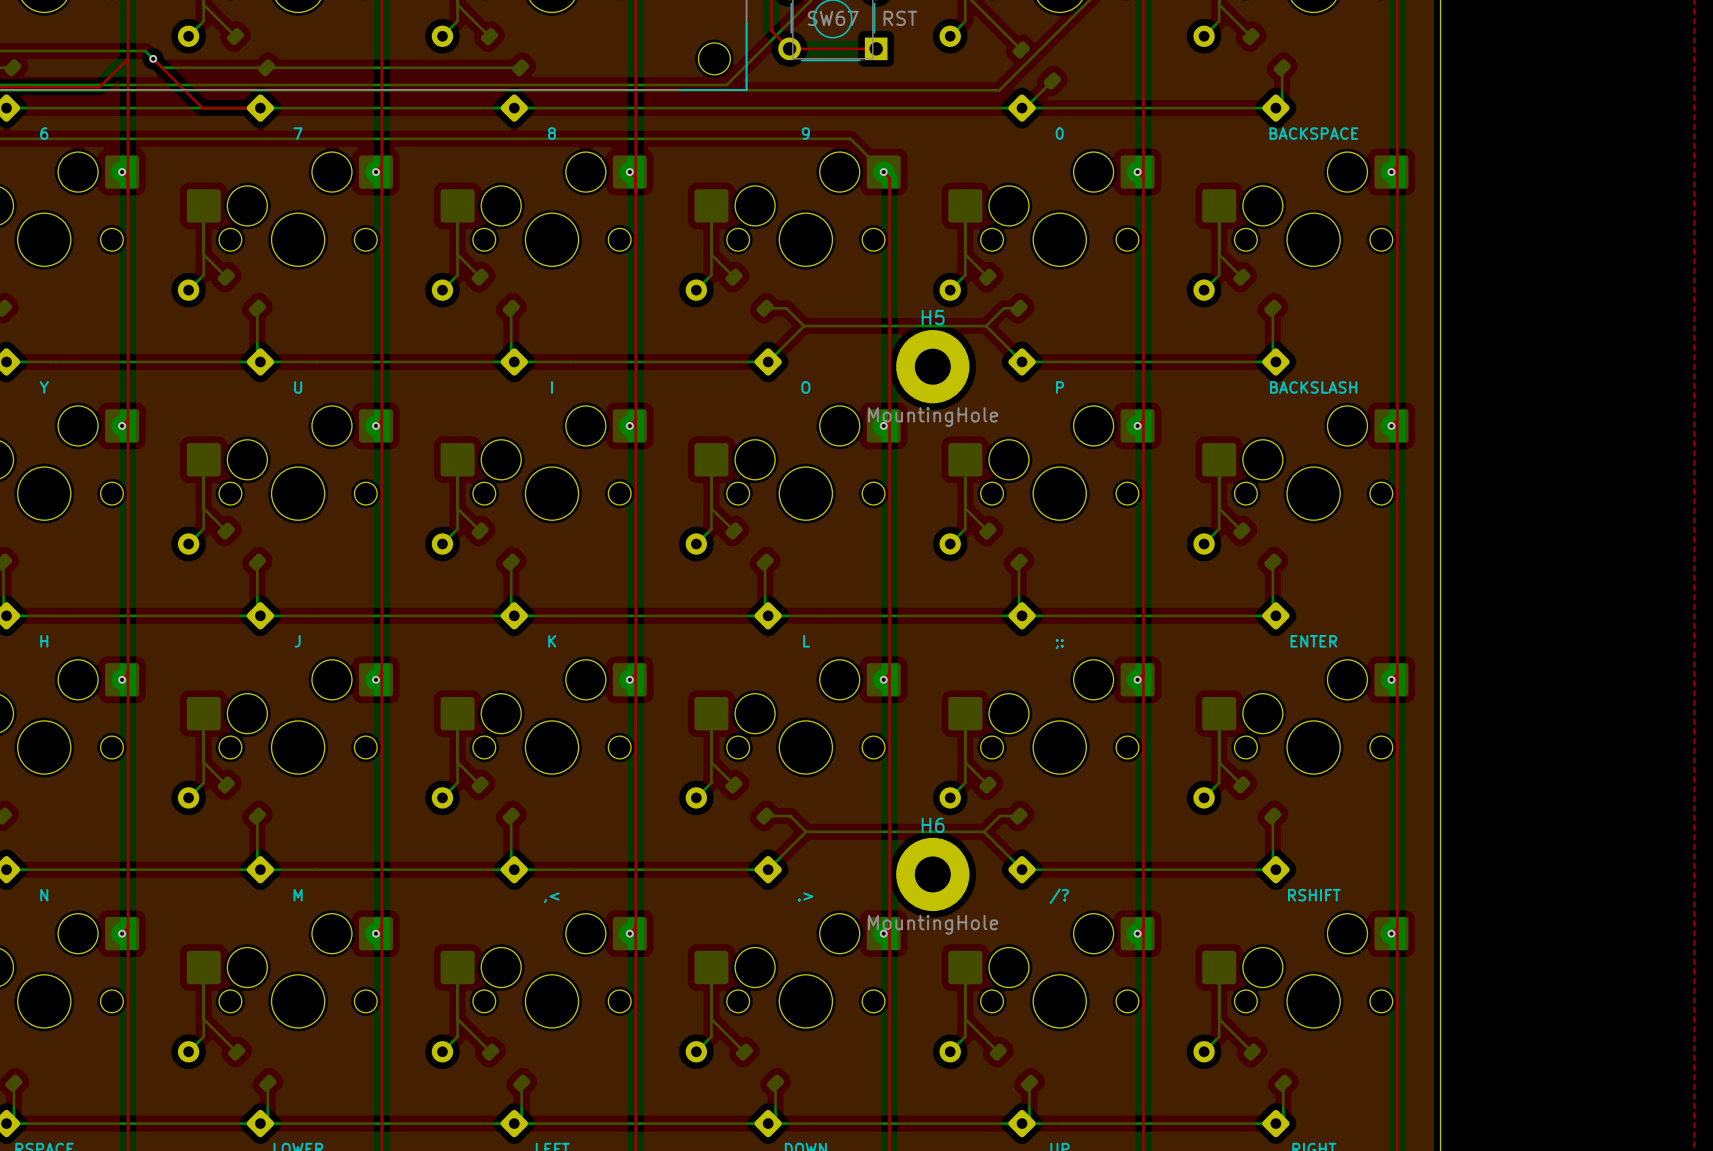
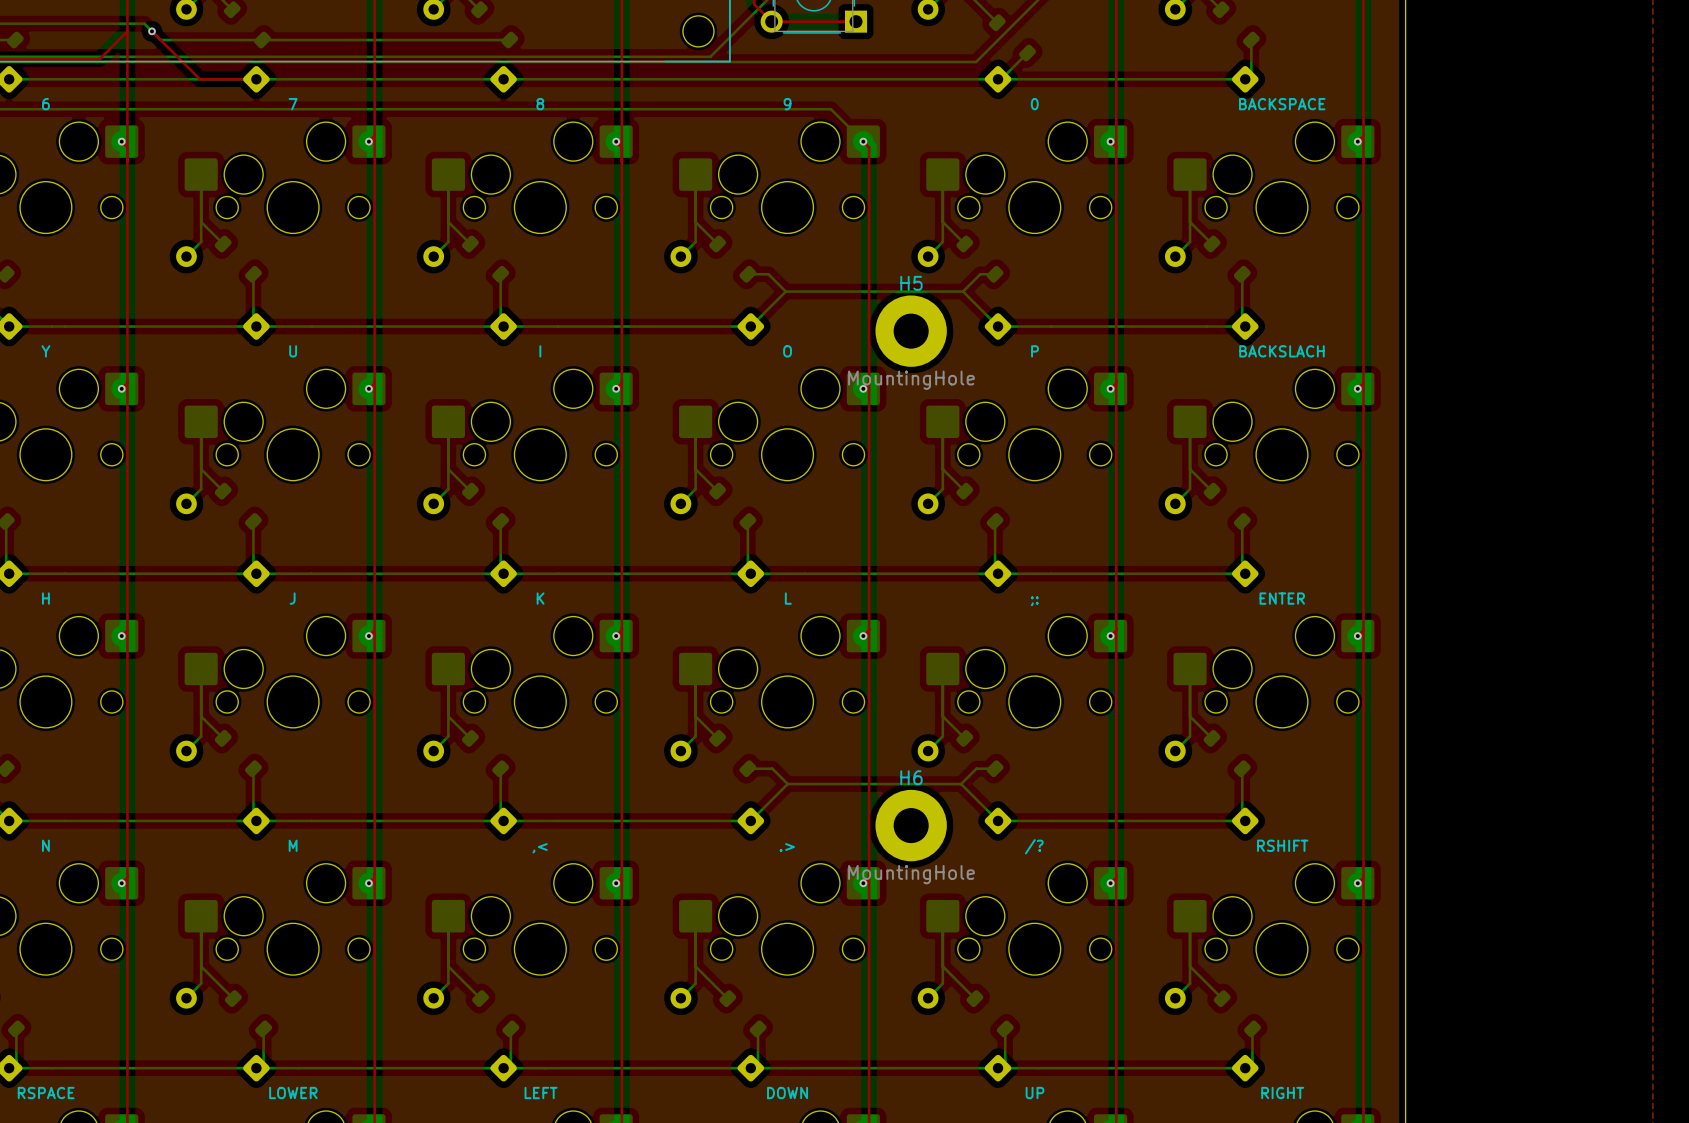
part value: BACKSLASH (1313, 387) -> BACKSLACH (1281, 351)

